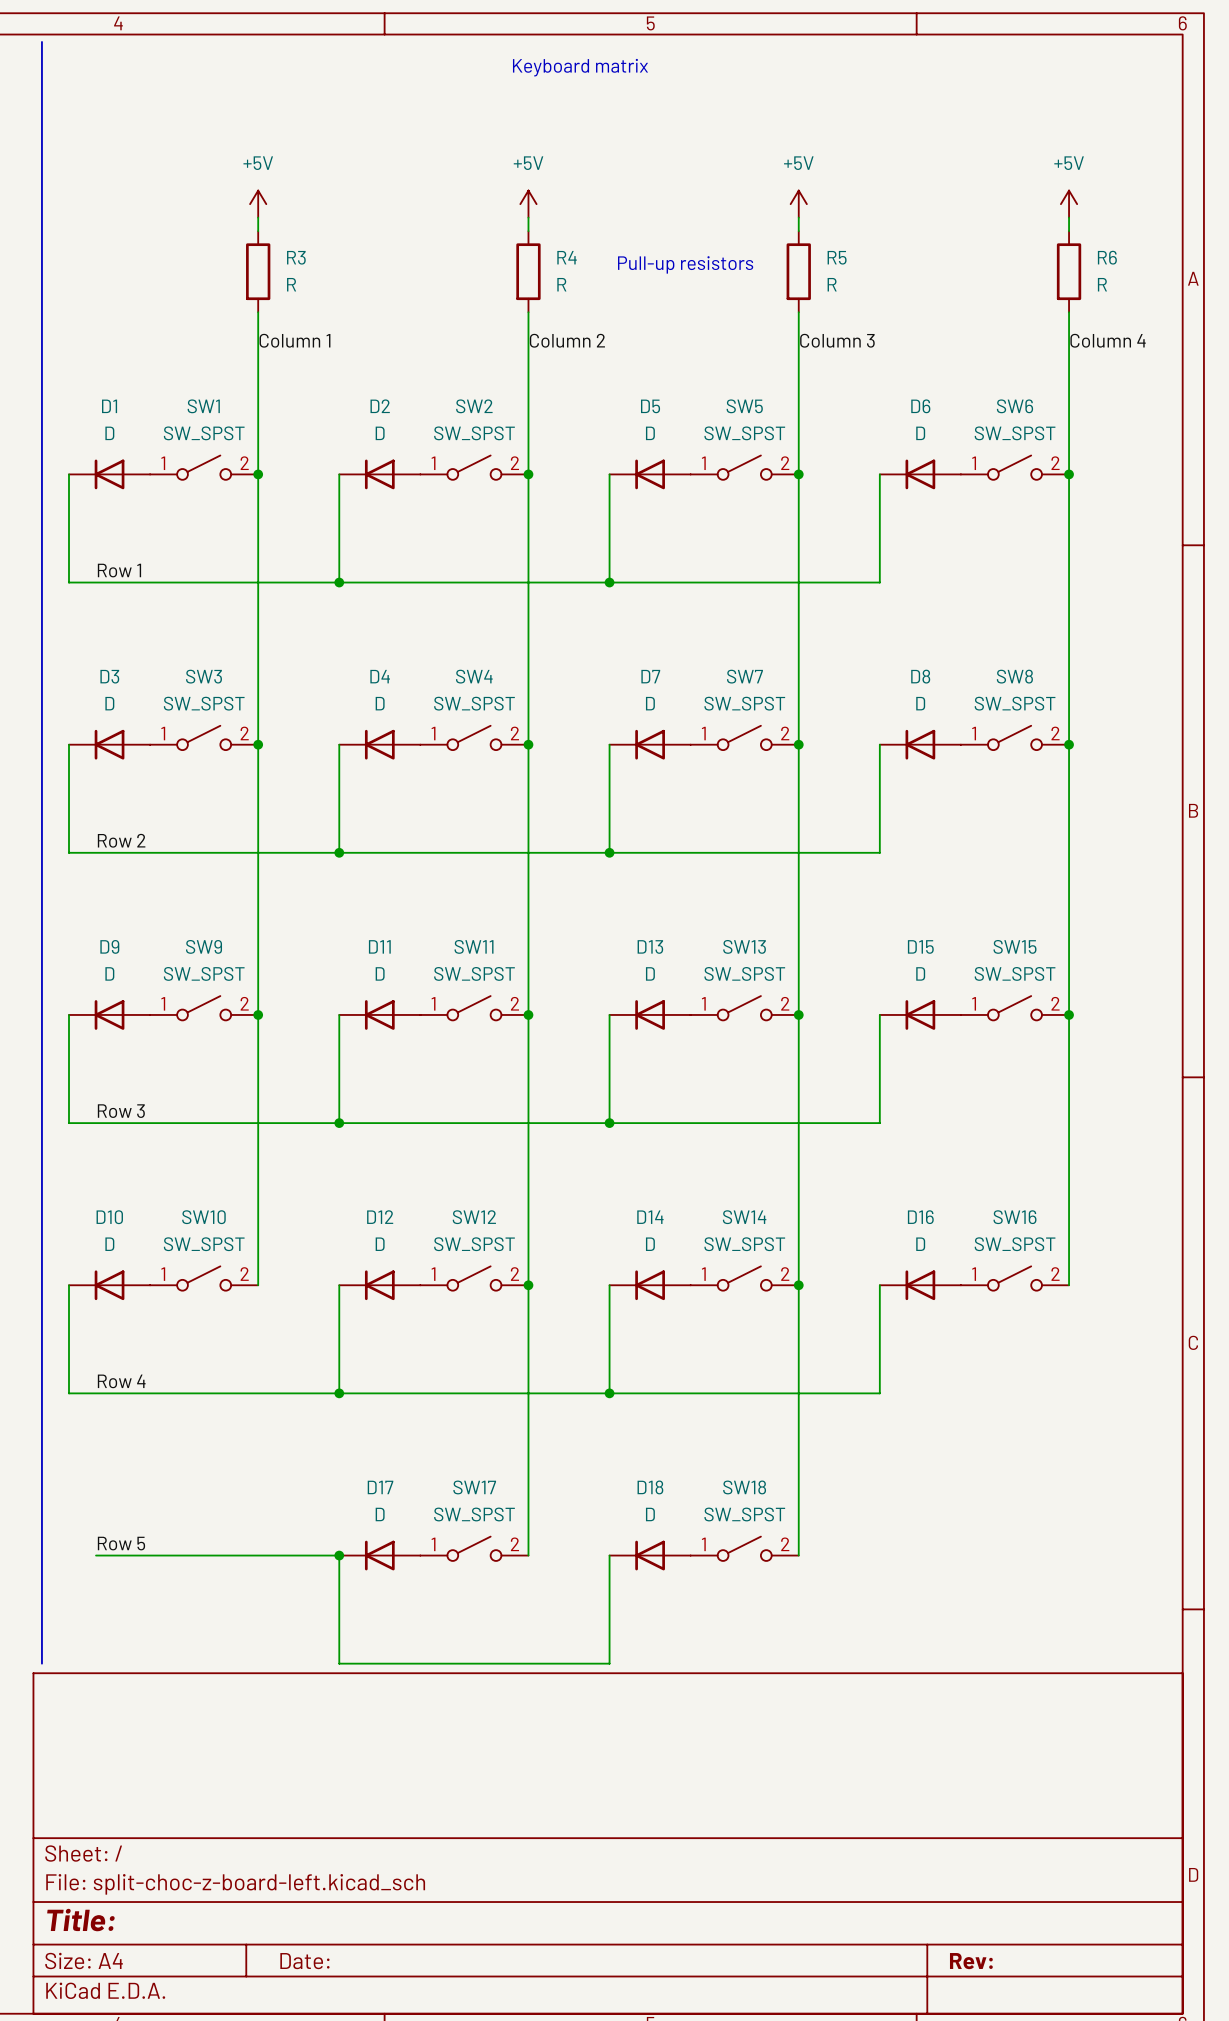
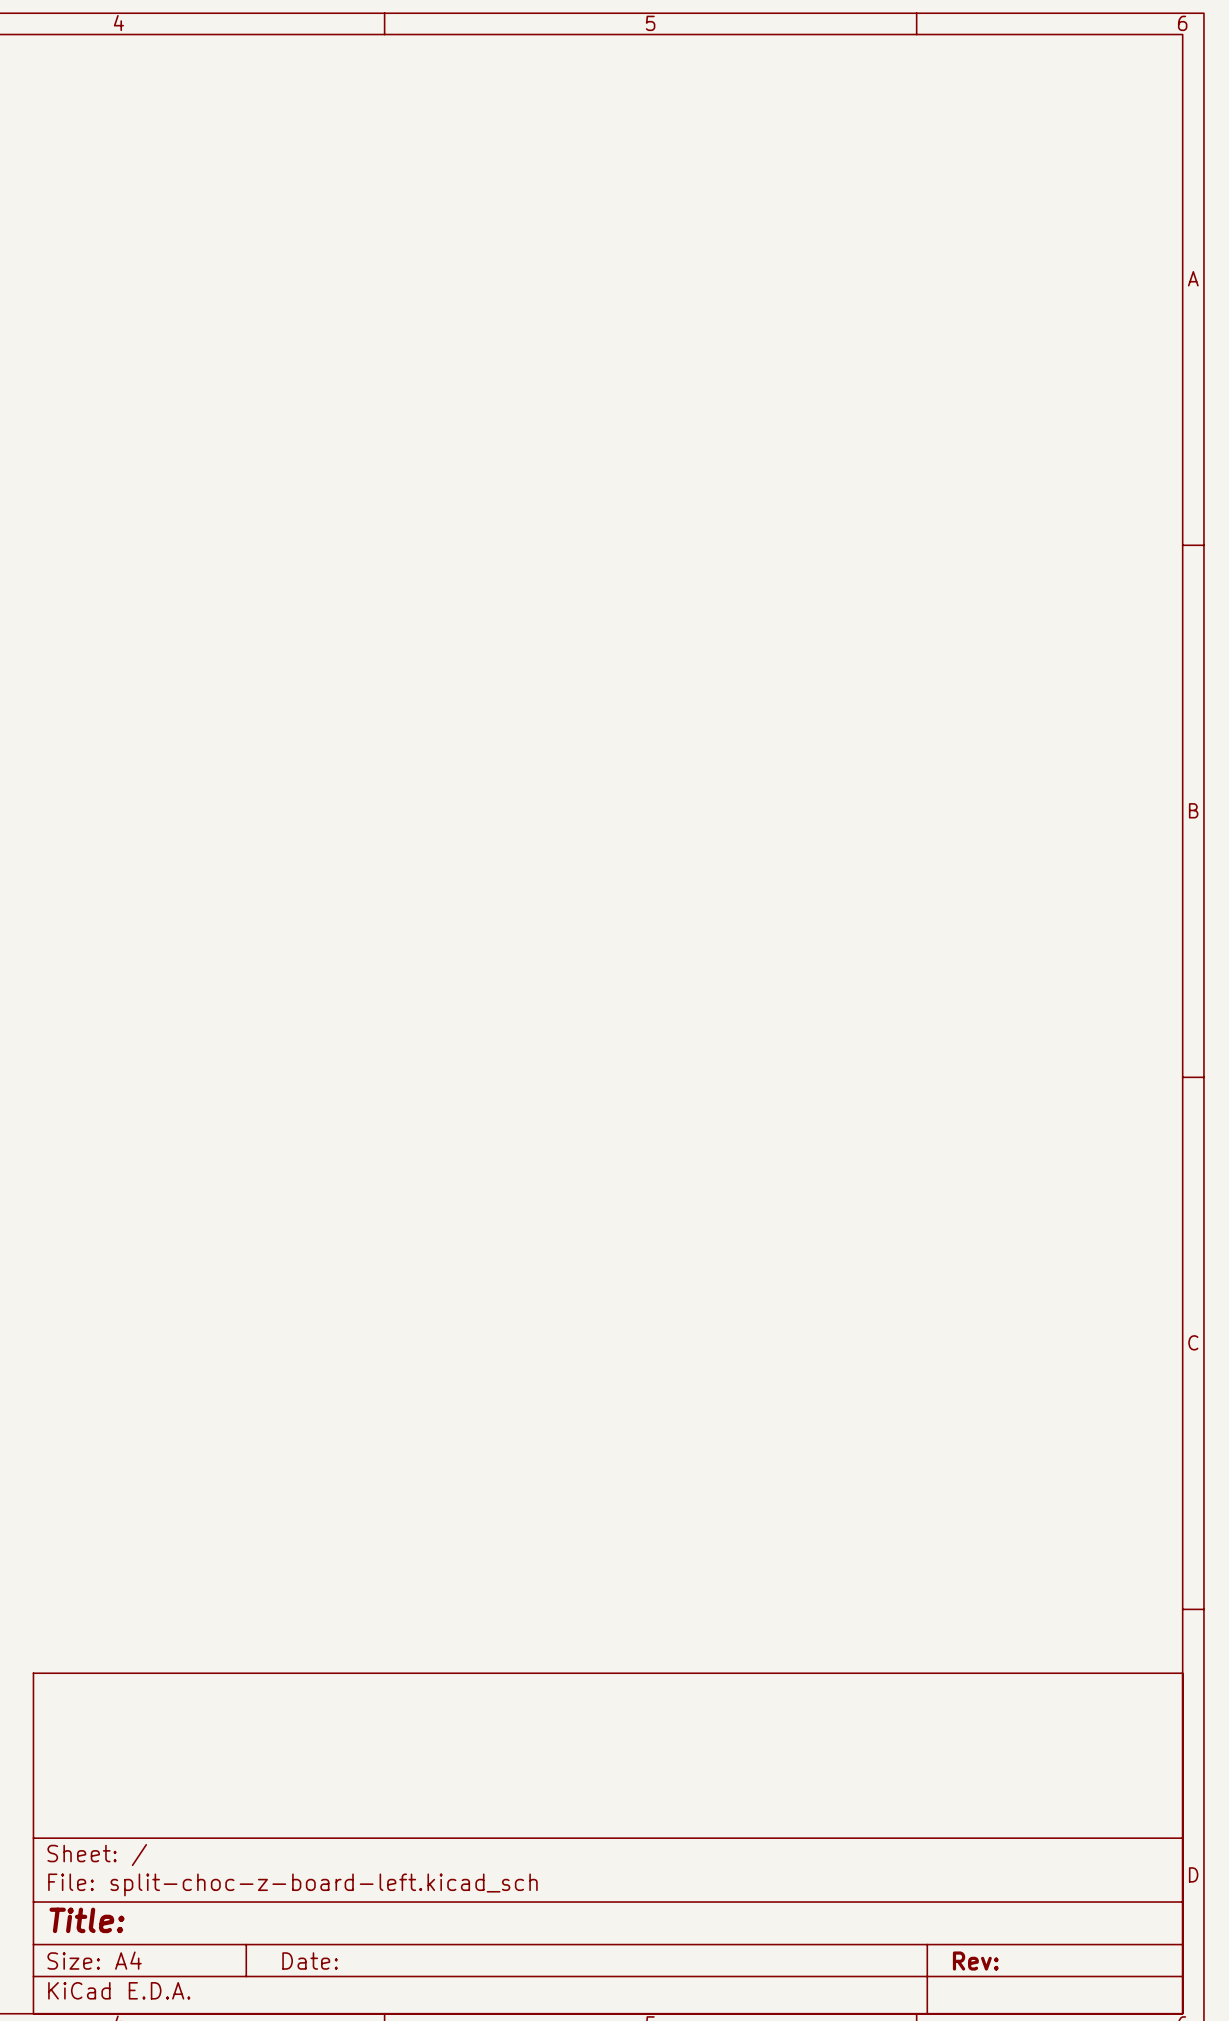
line: (41, 41) (41, 1663) -> none
text: Keyboard matrix (580, 67) -> none
power symbol: +5V (258, 204) -> none
power symbol: +5V (528, 204) -> none
power symbol: +5V (798, 204) -> none
power symbol: +5V (1069, 204) -> none
wire: (258, 217) (258, 231) -> none
wire: (528, 217) (528, 231) -> none
wire: (798, 217) (798, 231) -> none
wire: (1069, 217) (1069, 231) -> none
text: Pull-up resistors (685, 264) -> none
R3: R (258, 271) -> none
R4: R (528, 271) -> none
R5: R (798, 271) -> none
R6: R (1069, 271) -> none
wire: (258, 312) (258, 1285) -> none
wire: (528, 312) (528, 1555) -> none
wire: (798, 312) (798, 1555) -> none
wire: (1069, 312) (1069, 1285) -> none
label: Column 1 (295, 340) -> none
label: Column 2 (567, 340) -> none
label: Column 3 (837, 340) -> none
label: Column 4 (1108, 340) -> none
SW1: SW_SPST (204, 467) -> none
SW2: SW_SPST (474, 467) -> none
SW5: SW_SPST (744, 467) -> none
SW6: SW_SPST (1014, 467) -> none
wire: (68, 474) (68, 582) (879, 582) (879, 474) -> none
D1: D (109, 474) -> none
junction: (258, 474) -> none
wire: (339, 474) (339, 582) -> none
D2: D (379, 474) -> none
junction: (528, 474) -> none
wire: (609, 474) (609, 582) -> none
D5: D (650, 474) -> none
junction: (798, 474) -> none
D6: D (920, 474) -> none
junction: (1069, 474) -> none
label: Row 1 (119, 570) -> none
junction: (339, 582) -> none
junction: (609, 582) -> none
SW3: SW_SPST (204, 737) -> none
SW4: SW_SPST (474, 737) -> none
SW7: SW_SPST (744, 737) -> none
SW8: SW_SPST (1014, 737) -> none
wire: (68, 744) (68, 852) (879, 852) (879, 744) -> none
D3: D (109, 744) -> none
junction: (258, 744) -> none
wire: (339, 744) (339, 852) -> none
D4: D (379, 744) -> none
junction: (528, 744) -> none
wire: (609, 744) (609, 852) -> none
D7: D (650, 744) -> none
junction: (798, 744) -> none
D8: D (920, 744) -> none
junction: (1069, 744) -> none
label: Row 2 (121, 840) -> none
junction: (339, 852) -> none
junction: (609, 852) -> none
SW9: SW_SPST (204, 1008) -> none
SW11: SW_SPST (474, 1008) -> none
SW13: SW_SPST (744, 1008) -> none
SW15: SW_SPST (1014, 1008) -> none
wire: (68, 1014) (68, 1123) (879, 1123) (879, 1014) -> none
D9: D (109, 1014) -> none
junction: (258, 1014) -> none
wire: (339, 1014) (339, 1123) -> none
D11: D (379, 1014) -> none
junction: (528, 1014) -> none
wire: (609, 1014) (609, 1123) -> none
D13: D (650, 1014) -> none
junction: (798, 1014) -> none
D15: D (920, 1014) -> none
junction: (1069, 1014) -> none
label: Row 3 (121, 1111) -> none
junction: (339, 1123) -> none
junction: (609, 1123) -> none
SW10: SW_SPST (204, 1278) -> none
SW12: SW_SPST (474, 1278) -> none
SW14: SW_SPST (744, 1278) -> none
SW16: SW_SPST (1014, 1278) -> none
wire: (68, 1285) (68, 1393) (879, 1393) (879, 1285) -> none
D10: D (109, 1285) -> none
wire: (339, 1285) (339, 1393) -> none
D12: D (379, 1285) -> none
junction: (528, 1285) -> none
wire: (609, 1285) (609, 1393) -> none
D14: D (650, 1285) -> none
junction: (798, 1285) -> none
D16: D (920, 1285) -> none
label: Row 4 (121, 1381) -> none
junction: (339, 1393) -> none
junction: (609, 1393) -> none
label: Row 5 (121, 1543) -> none
SW17: SW_SPST (474, 1548) -> none
SW18: SW_SPST (744, 1548) -> none
wire: (96, 1555) (339, 1555) (339, 1663) (609, 1663) (609, 1555) -> none
junction: (339, 1555) -> none
D17: D (379, 1555) -> none
D18: D (650, 1555) -> none

